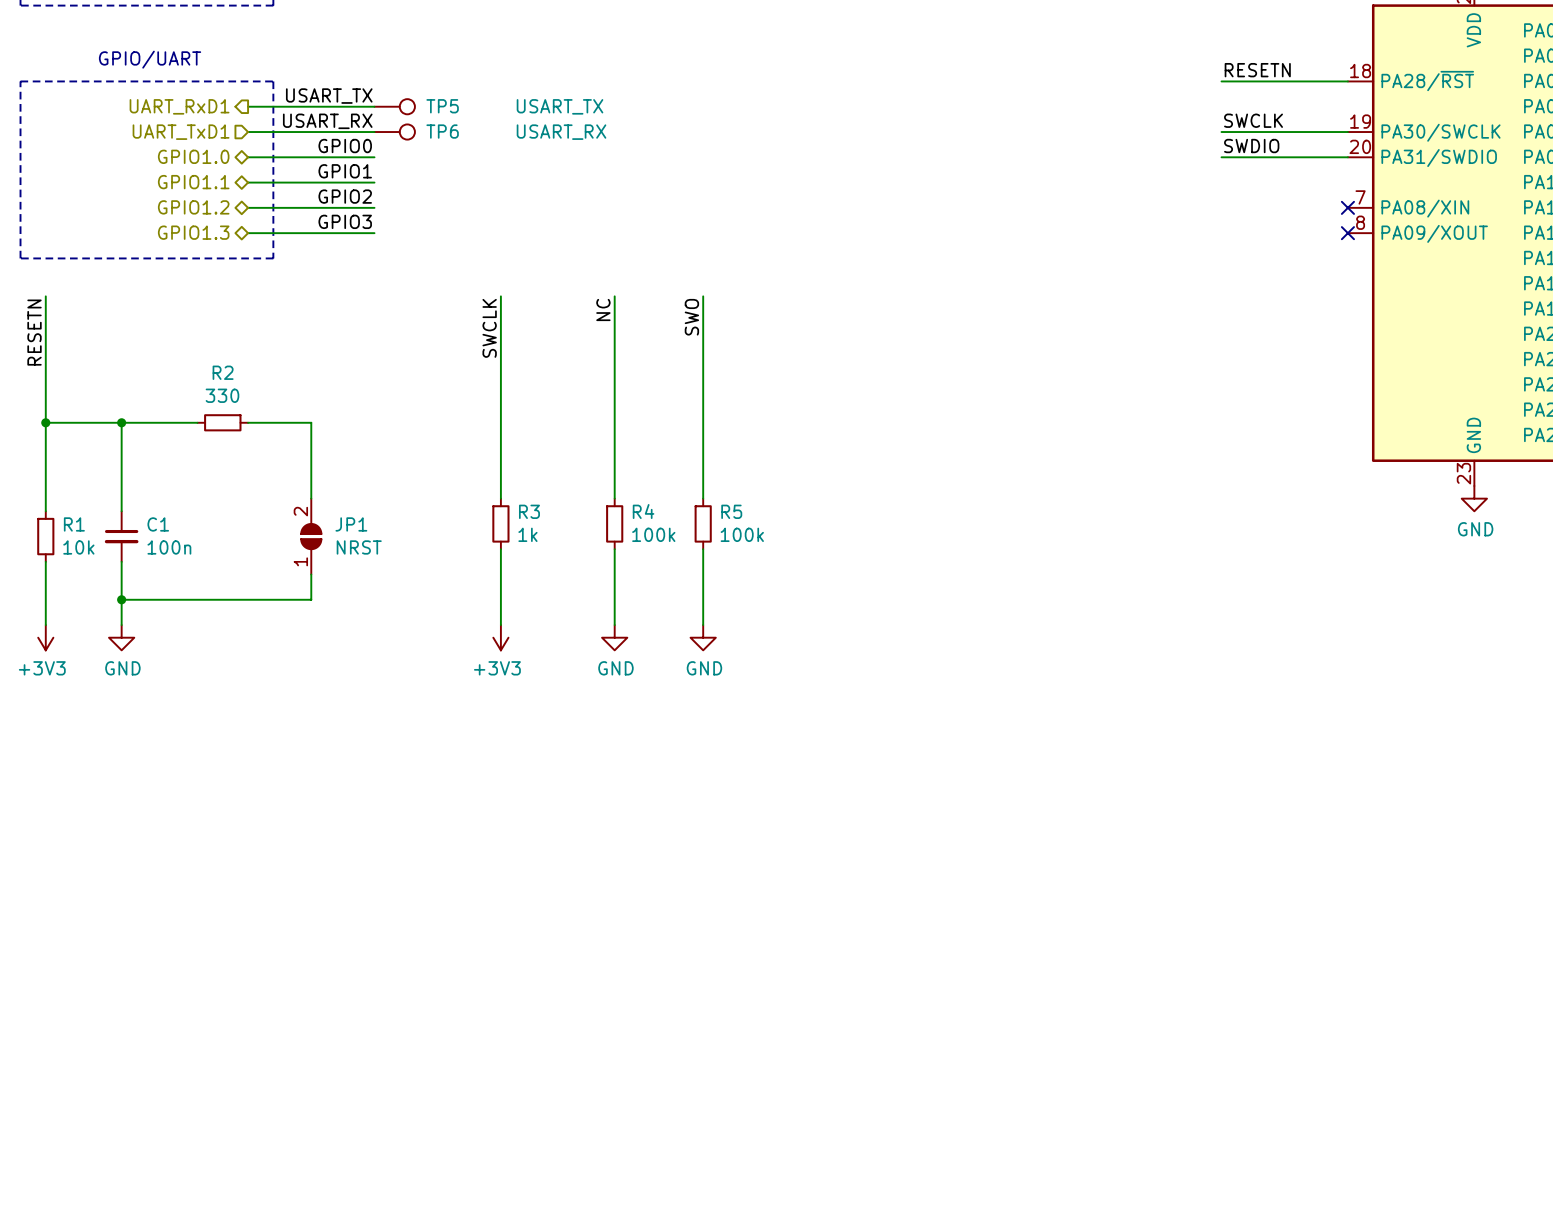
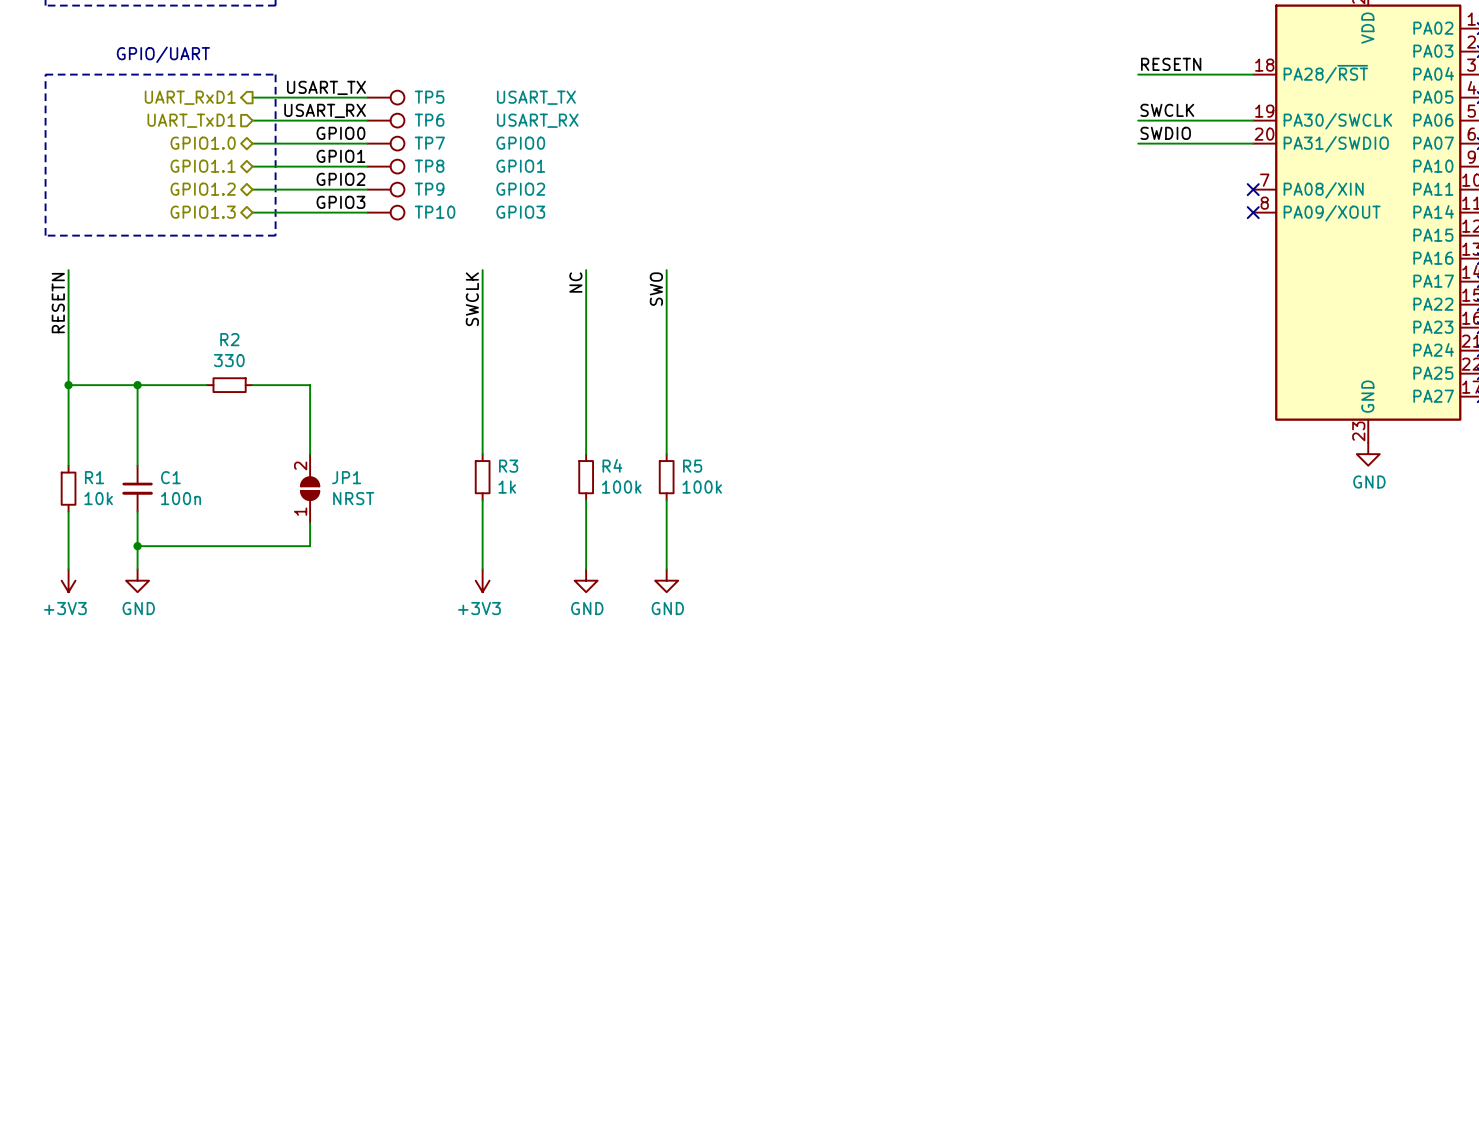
TP7: none -> GPIO0 (386, 143)
TP8: none -> GPIO1 (386, 166)
TP9: none -> GPIO2 (386, 189)
TP10: none -> GPIO3 (386, 212)

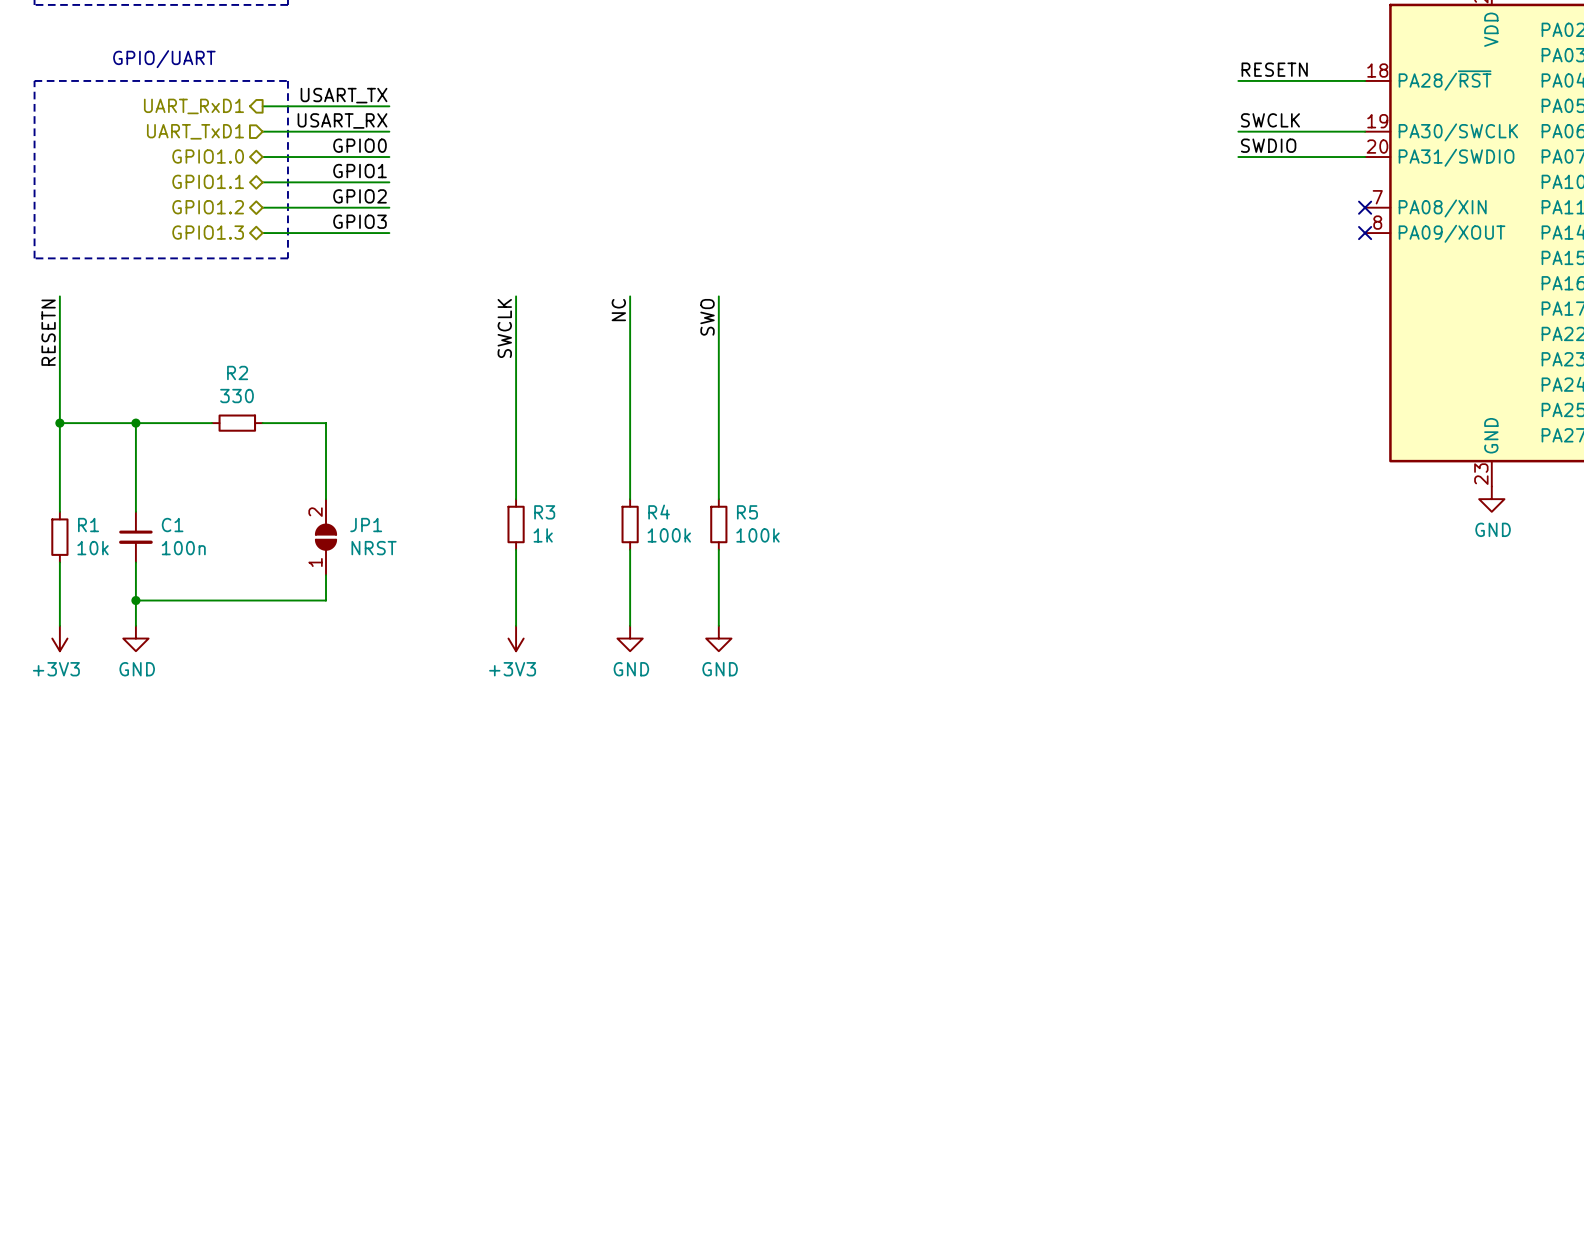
TP5: USART_TX (386, 97) -> none
TP6: USART_RX (386, 120) -> none
TP7: GPIO0 (386, 143) -> none
TP8: GPIO1 (386, 166) -> none
TP9: GPIO2 (386, 189) -> none
TP10: GPIO3 (386, 212) -> none

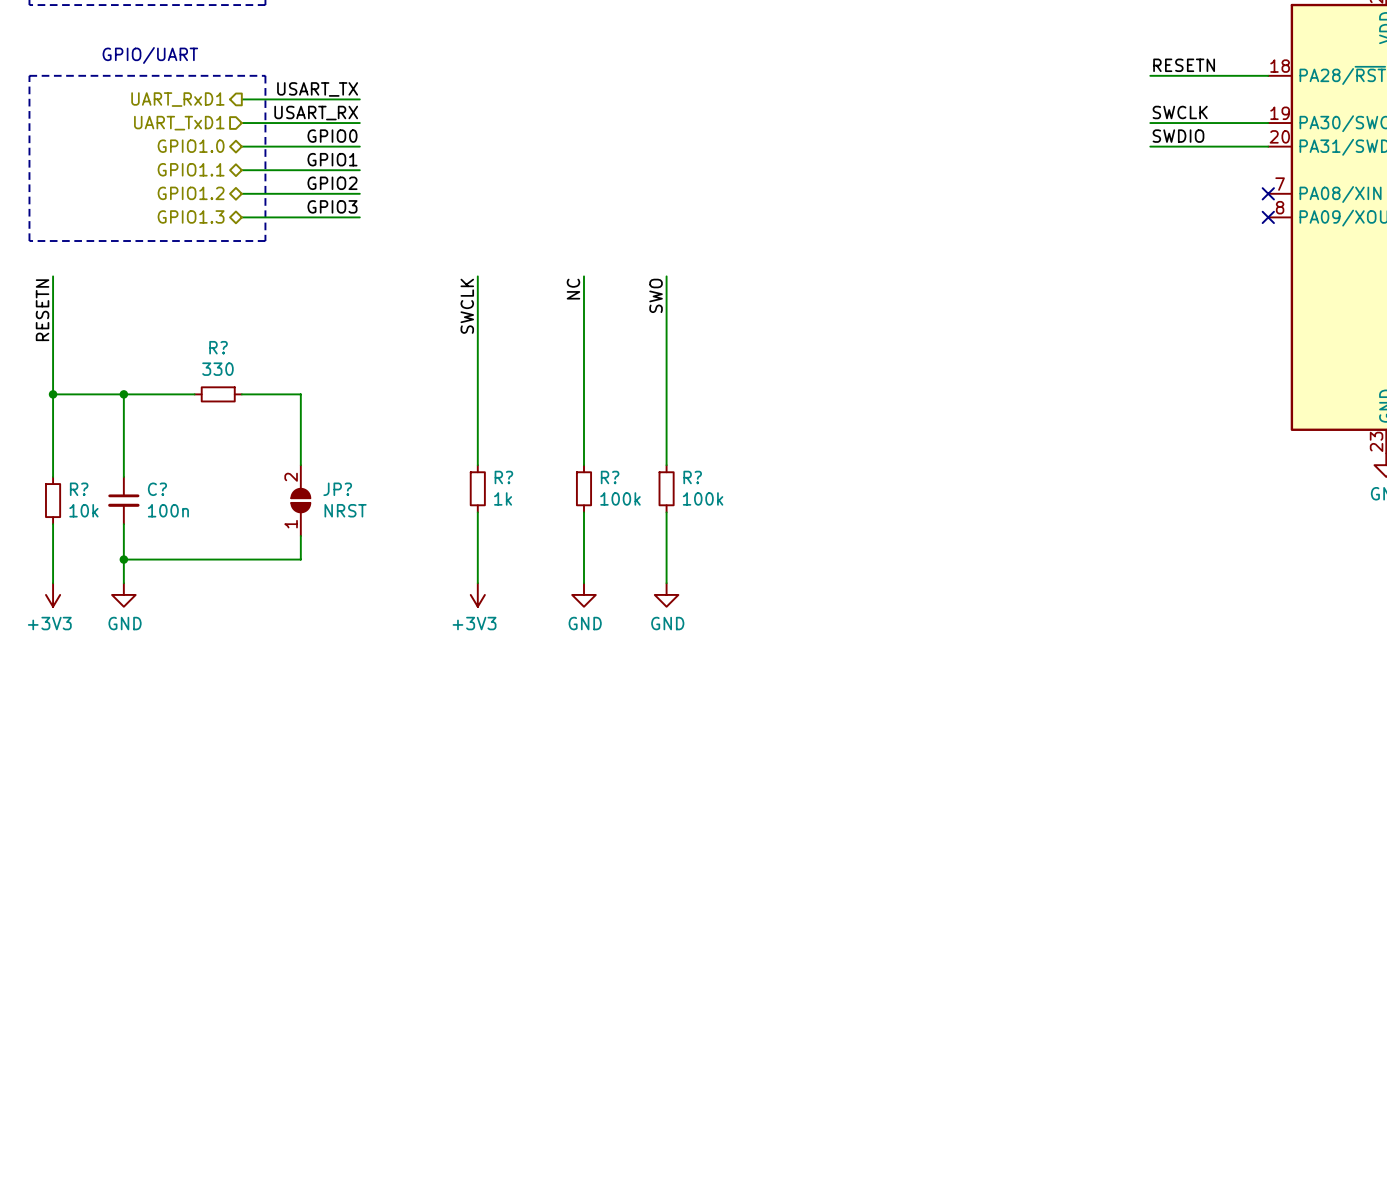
R2 name: R2 (237, 372) -> R? (218, 347)
R3 name: R3 (544, 512) -> R? (503, 477)
R4 name: R4 (659, 512) -> R? (610, 477)
R5 name: R5 (747, 512) -> R? (692, 477)
R1 name: R1 (88, 525) -> R? (79, 489)
C1 name: C1 (172, 525) -> C? (157, 489)
JP1 name: JP1 (366, 525) -> JP? (337, 489)

